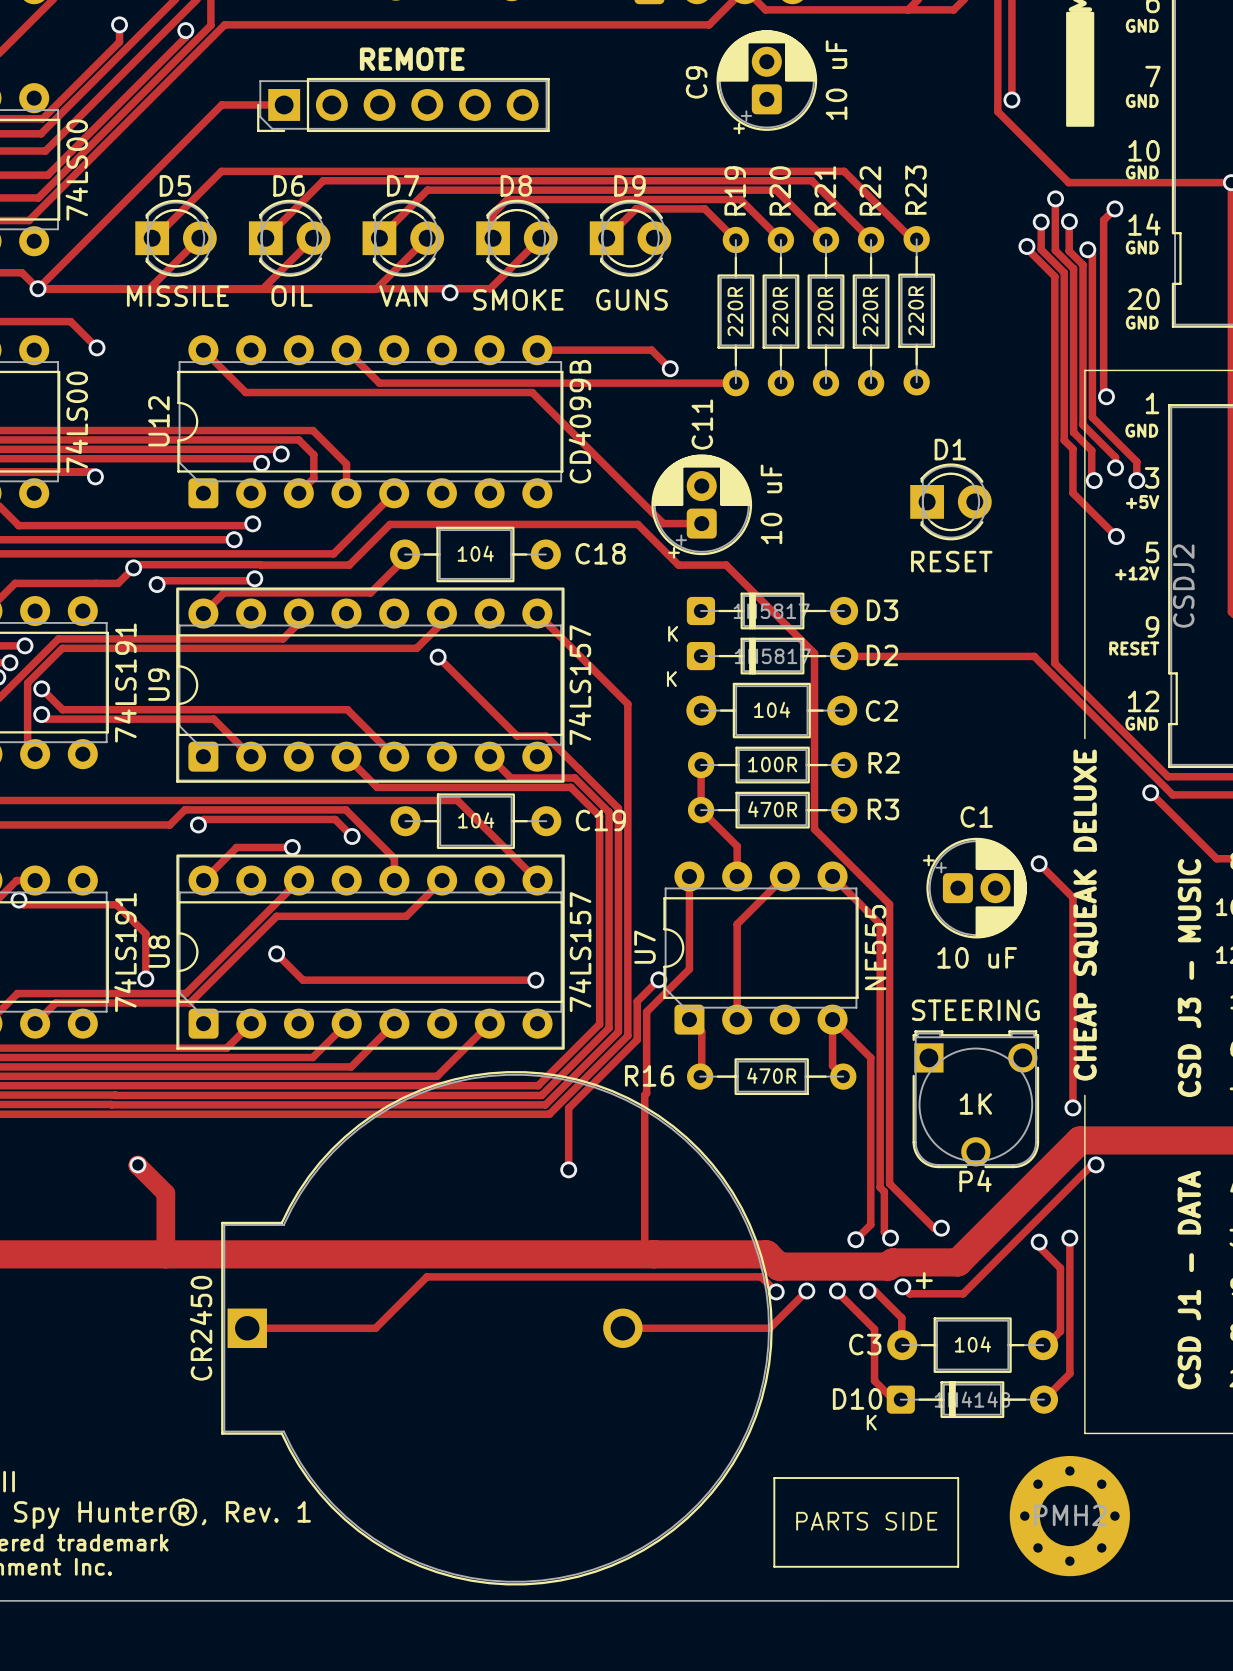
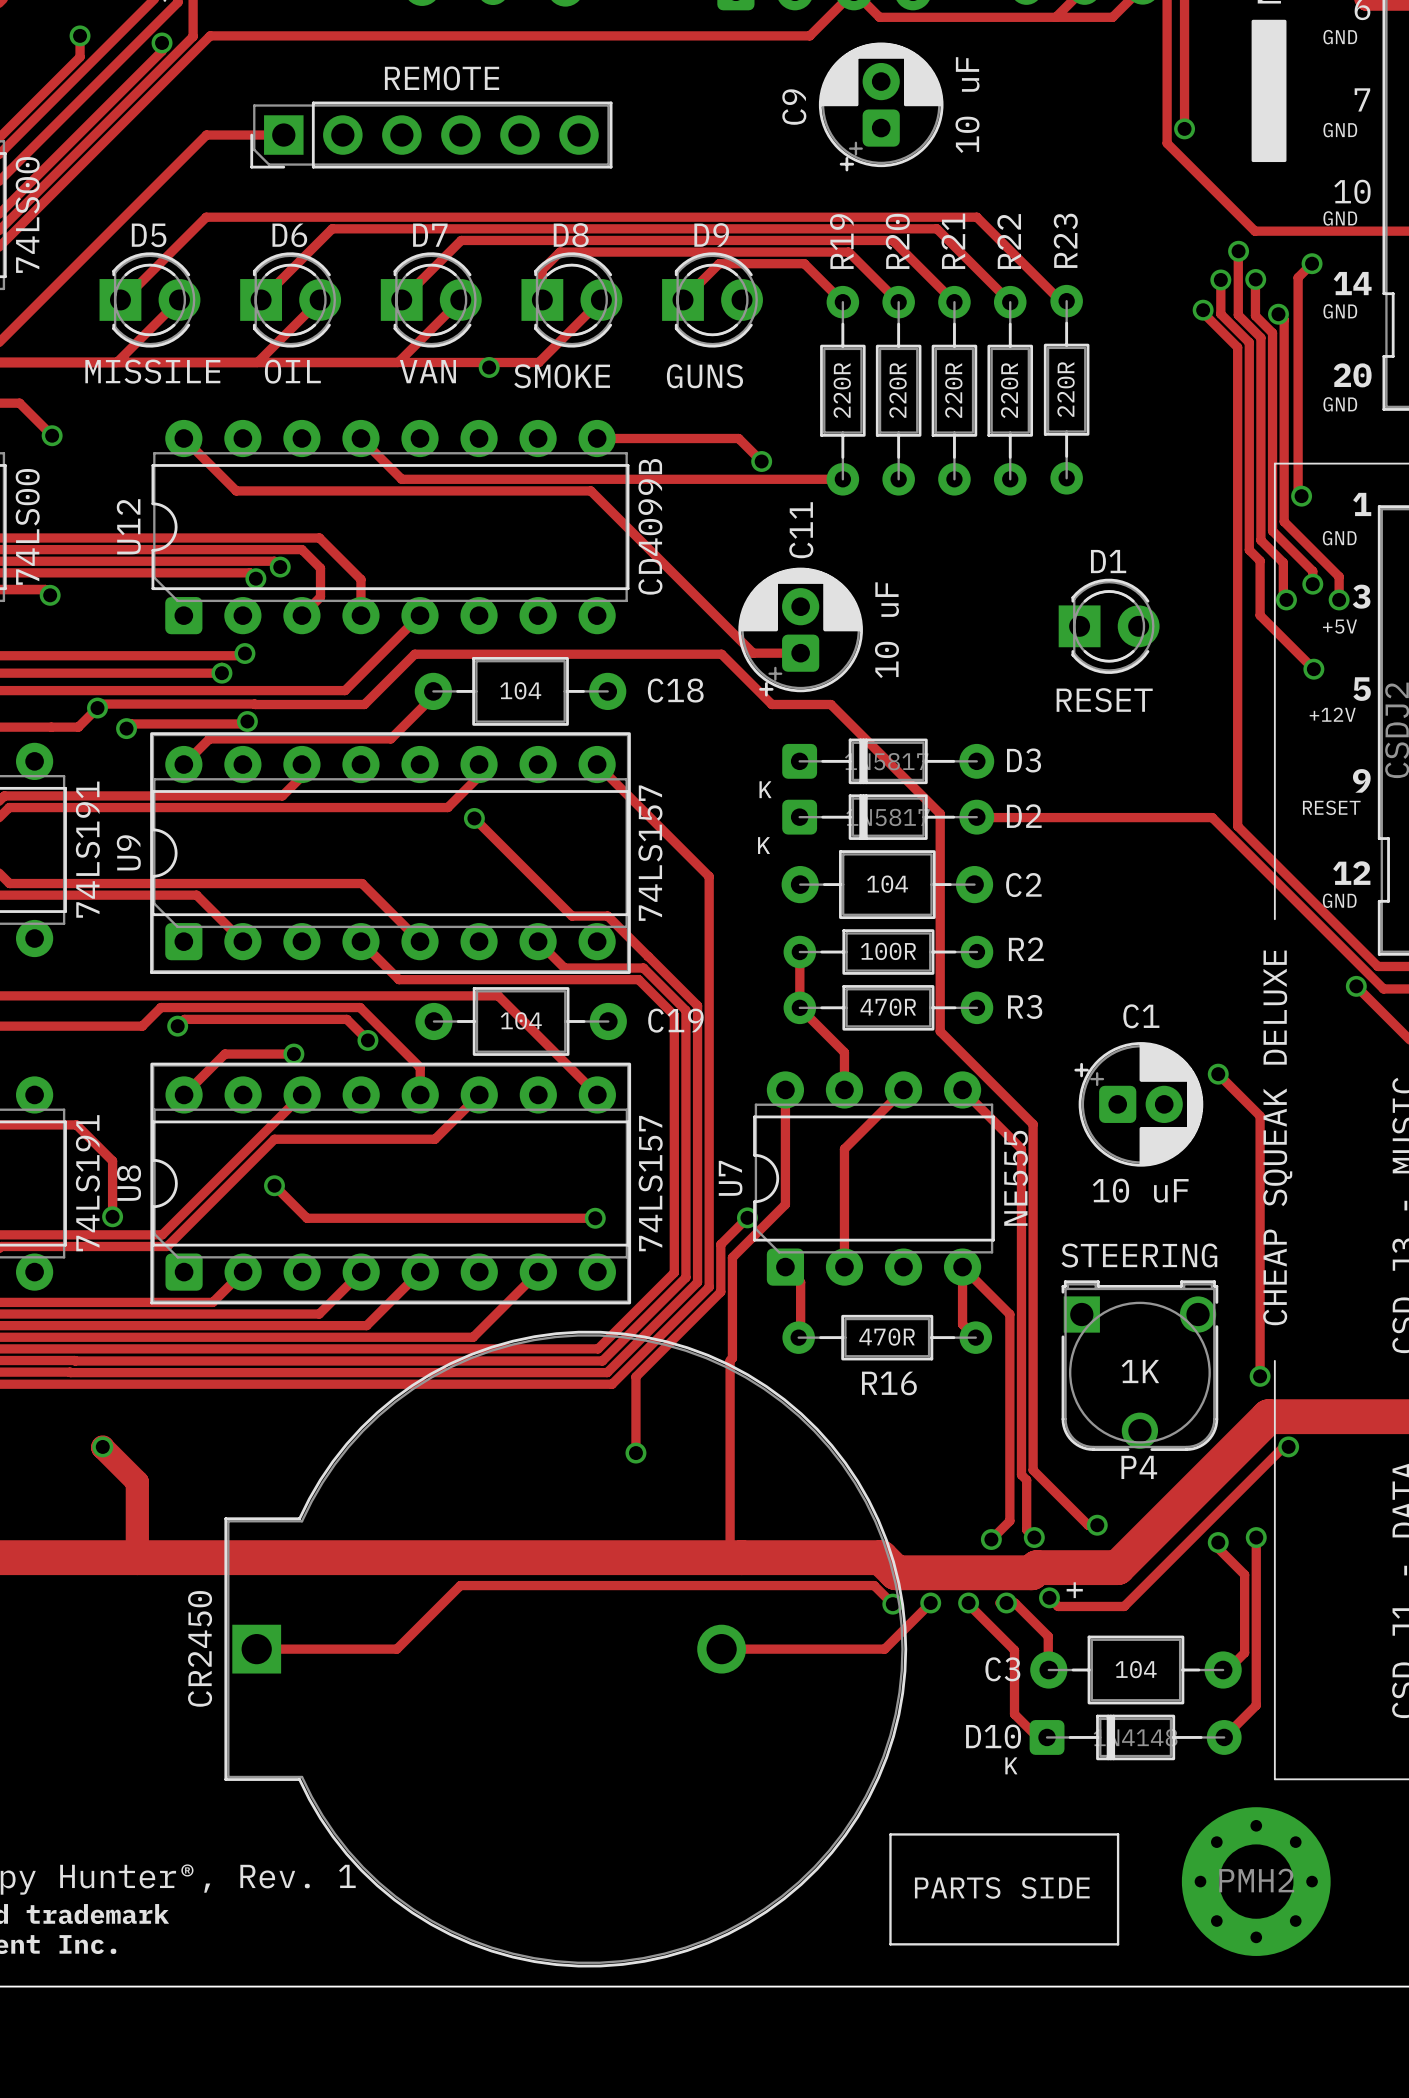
R16 name position: R16 (649, 1075) -> R16 (889, 1383)
CR2450 position: (496, 1328) -> (565, 1649)

